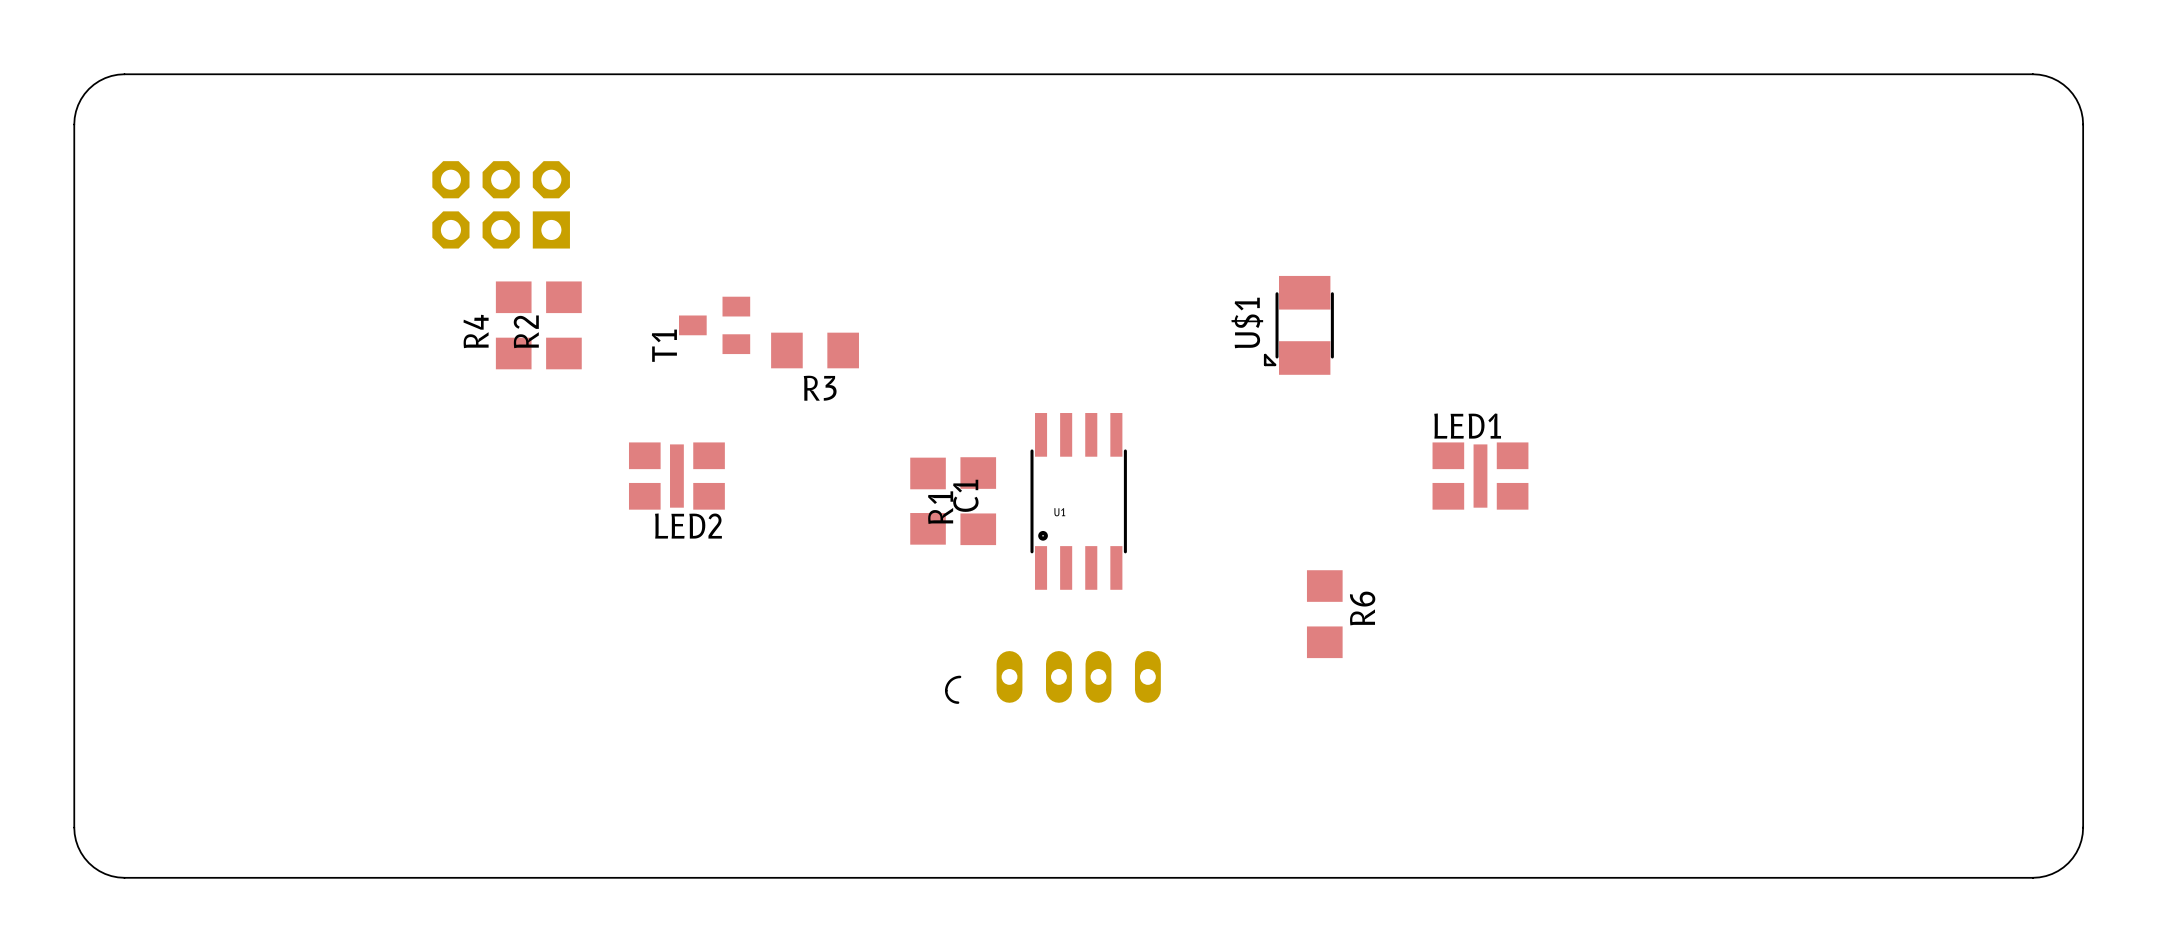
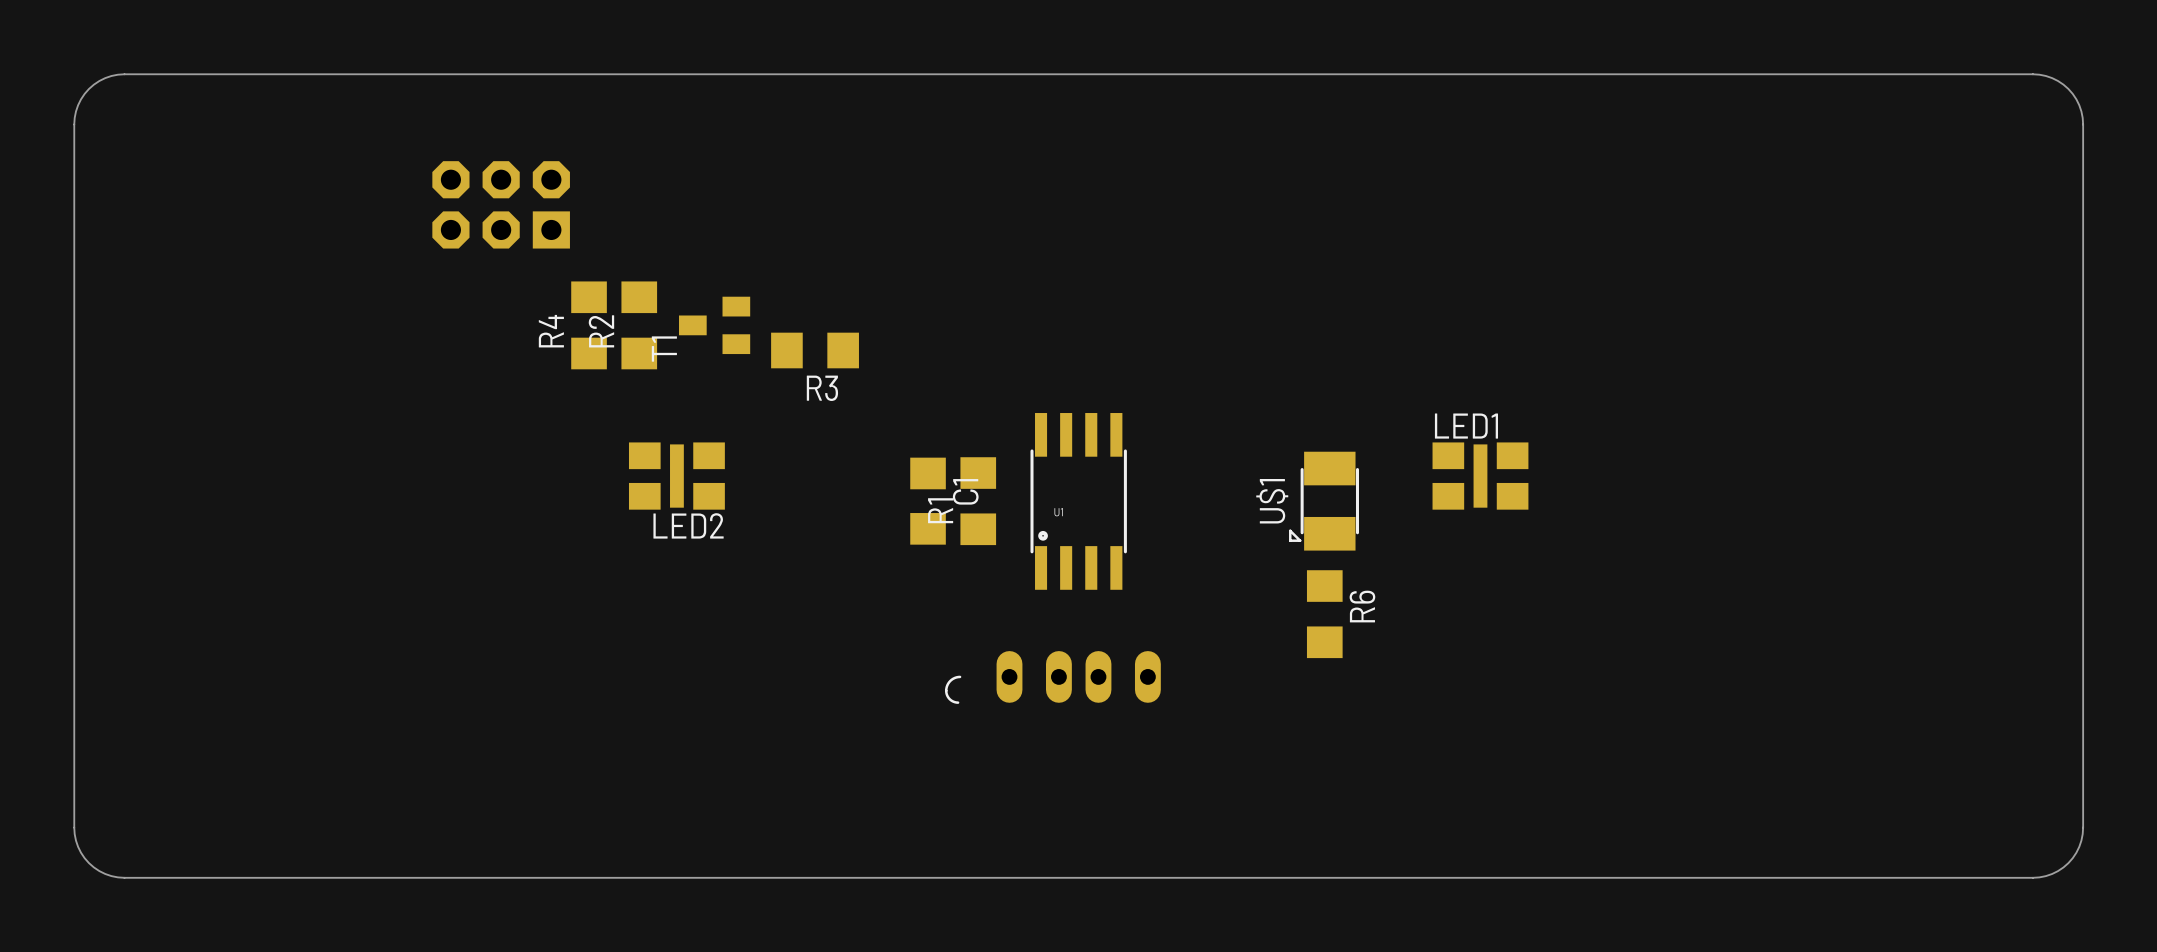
R4 position: (513, 325) -> (589, 325)
R2 position: (563, 325) -> (639, 325)
U$1 position: (1298, 325) -> (1324, 501)

